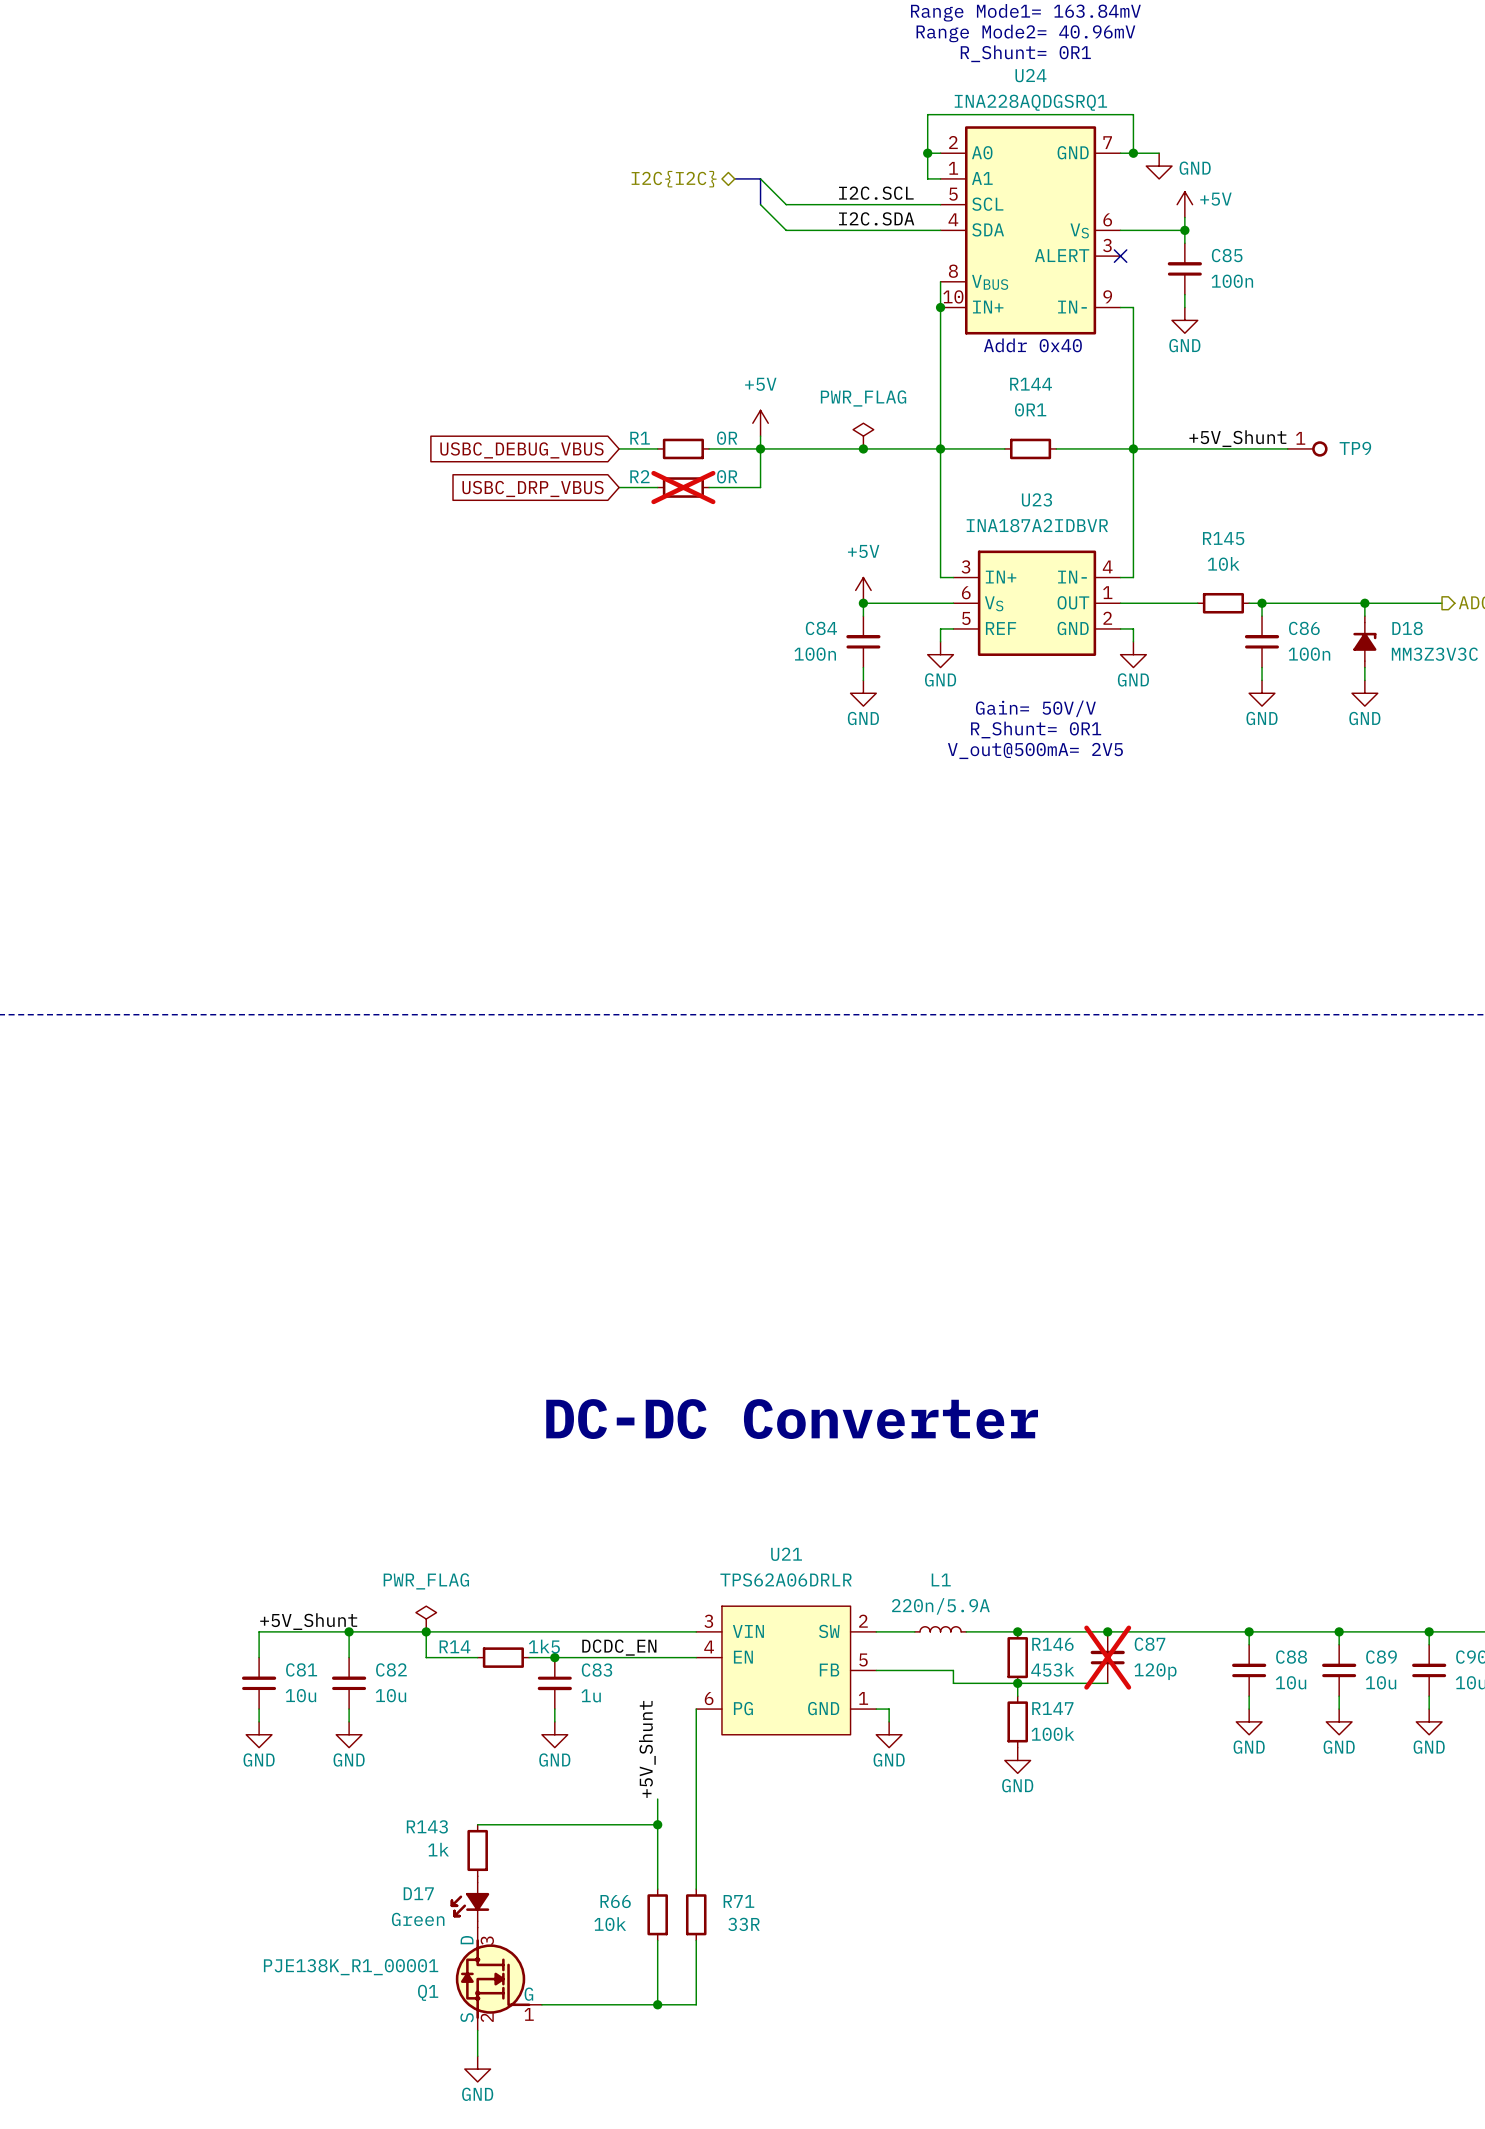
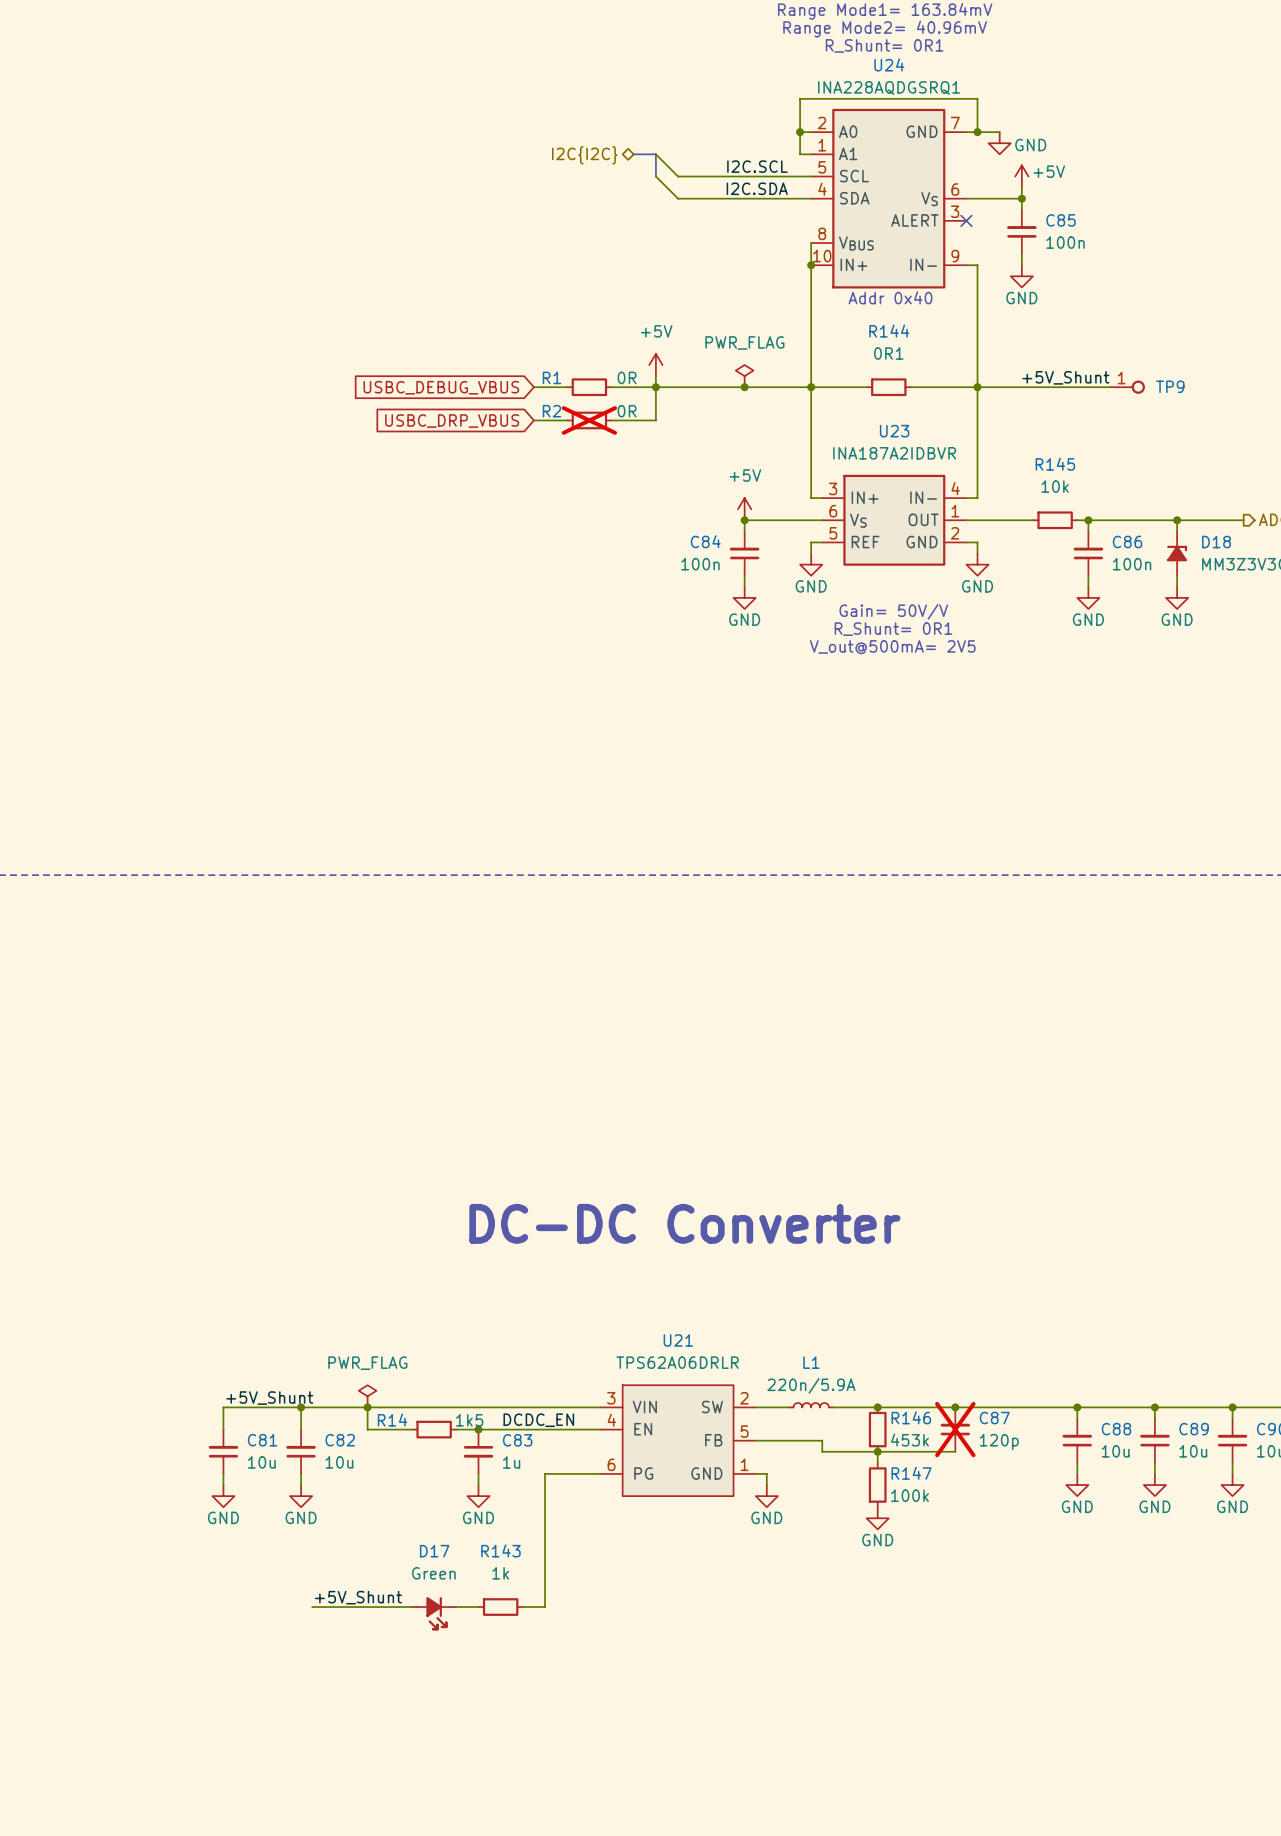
wire: (696, 1709) (696, 1889) -> (600, 1473) (545, 1473) (545, 1607) (522, 1607)
label: +5V_Shunt (647, 1749) -> none
wire: (657, 1799) (657, 1889) -> none
wire: (477, 1824) (657, 1824) -> none
junction: (657, 1824) -> none
R143 name position: R143 (427, 1826) -> R143 (500, 1550)
R143 rotation: 0° (477, 1850) -> 90° clockwise (500, 1607)
R143 position: (477, 1850) -> (500, 1607)
label: none -> +5V_Shunt (358, 1597)
wire: none -> (312, 1607) (411, 1607)
wire: none -> (456, 1607) (478, 1607)
D17 name position: D17 (418, 1893) -> D17 (434, 1551)
D17 rotation: 0° (469, 1901) -> 90° counterclockwise (434, 1613)
D17 position: (469, 1901) -> (434, 1613)
R66: (657, 1914) -> none
R71: (696, 1914) -> none
D17 text position: Green (418, 1919) -> Green (433, 1573)
wire: (657, 1940) (657, 2004) -> none
wire: (696, 1940) (696, 2004) (541, 2004) -> none
Q1: (498, 1979) -> none
junction: (657, 2004) -> none
wire: (477, 2030) (477, 2056) -> none
power symbol: GND (477, 2069) -> none

